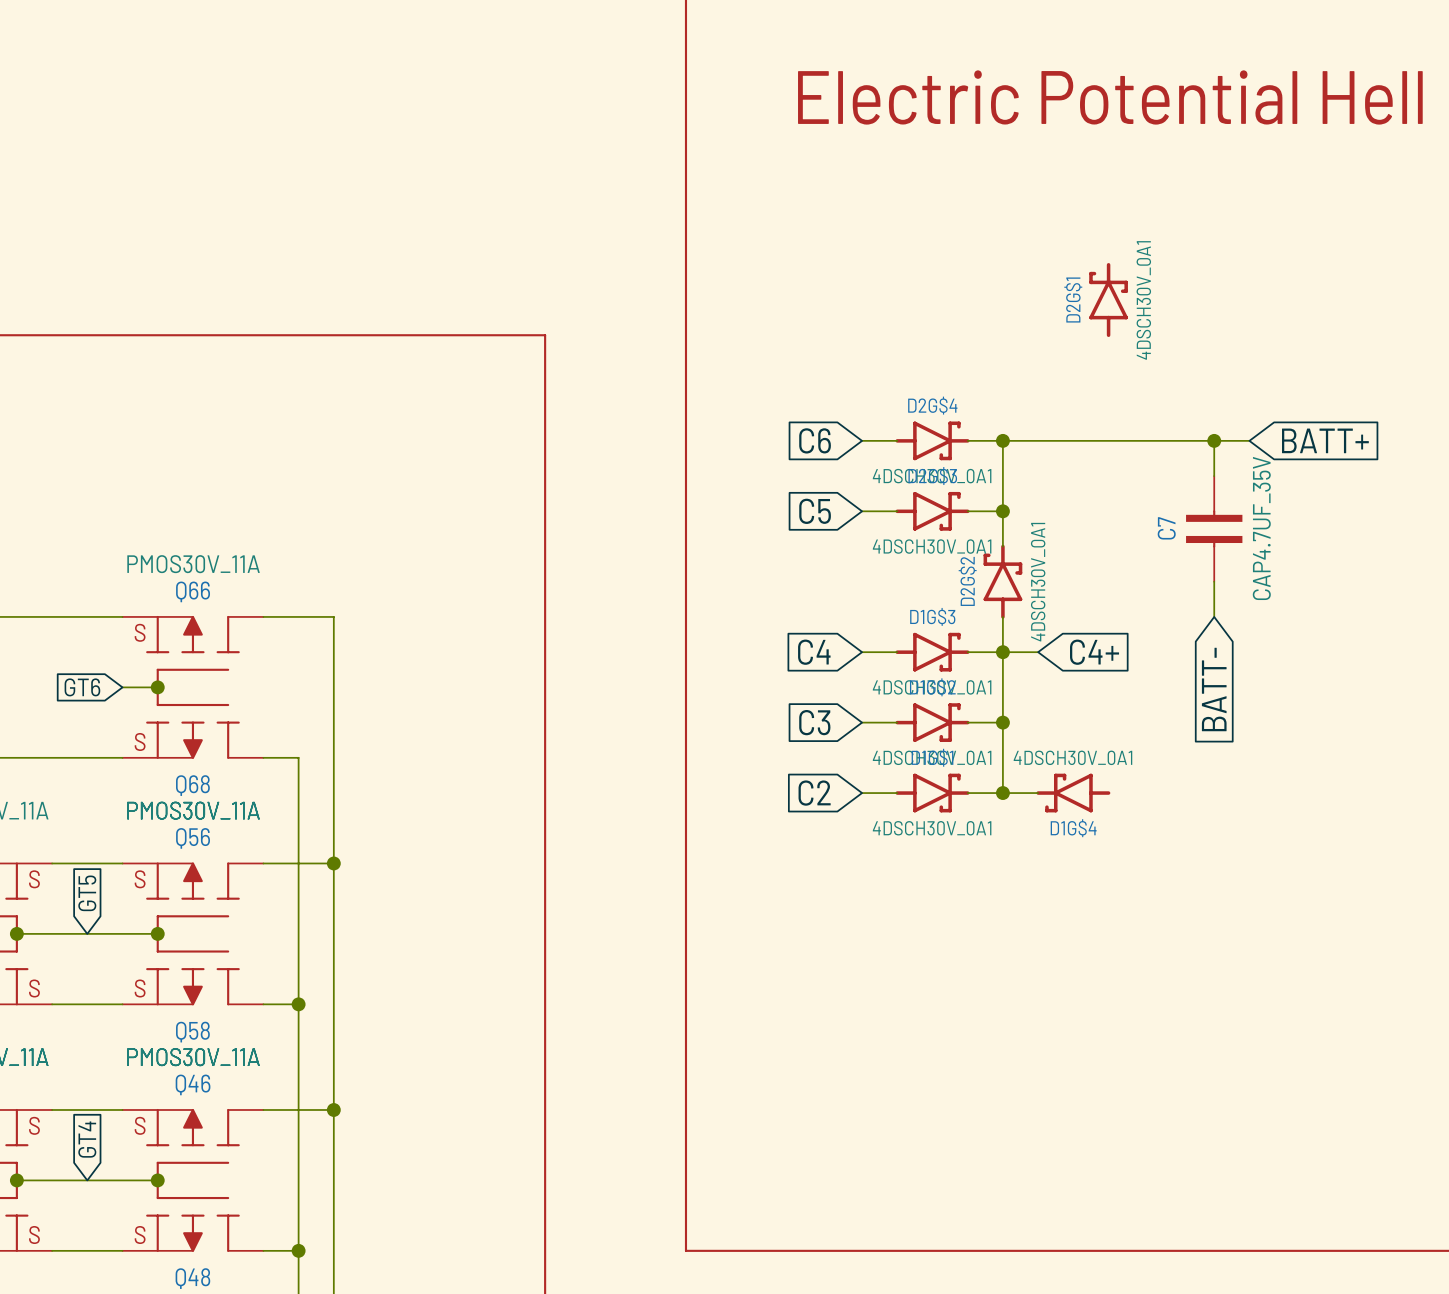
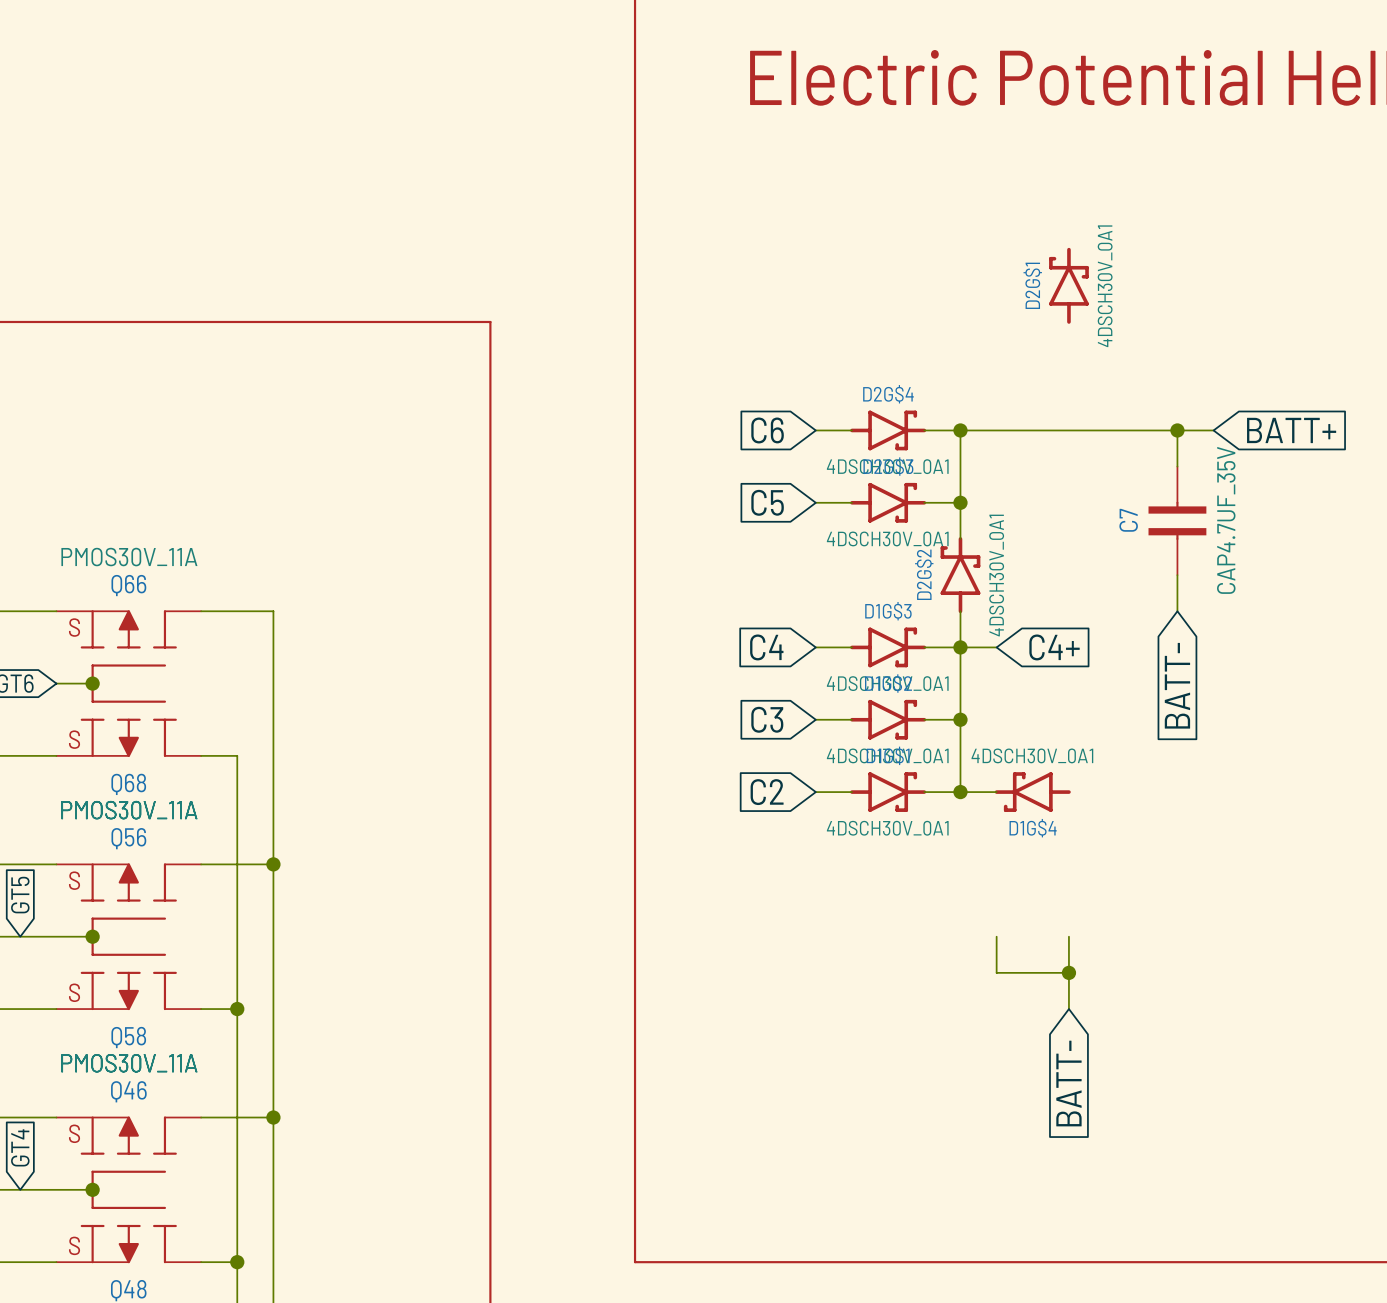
wire: none -> (996, 936) (996, 972) (1068, 972)
wire: none -> (1068, 936) (1068, 1009)
junction: none -> (1068, 972)
global label: none -> BATT- (1068, 1083)

